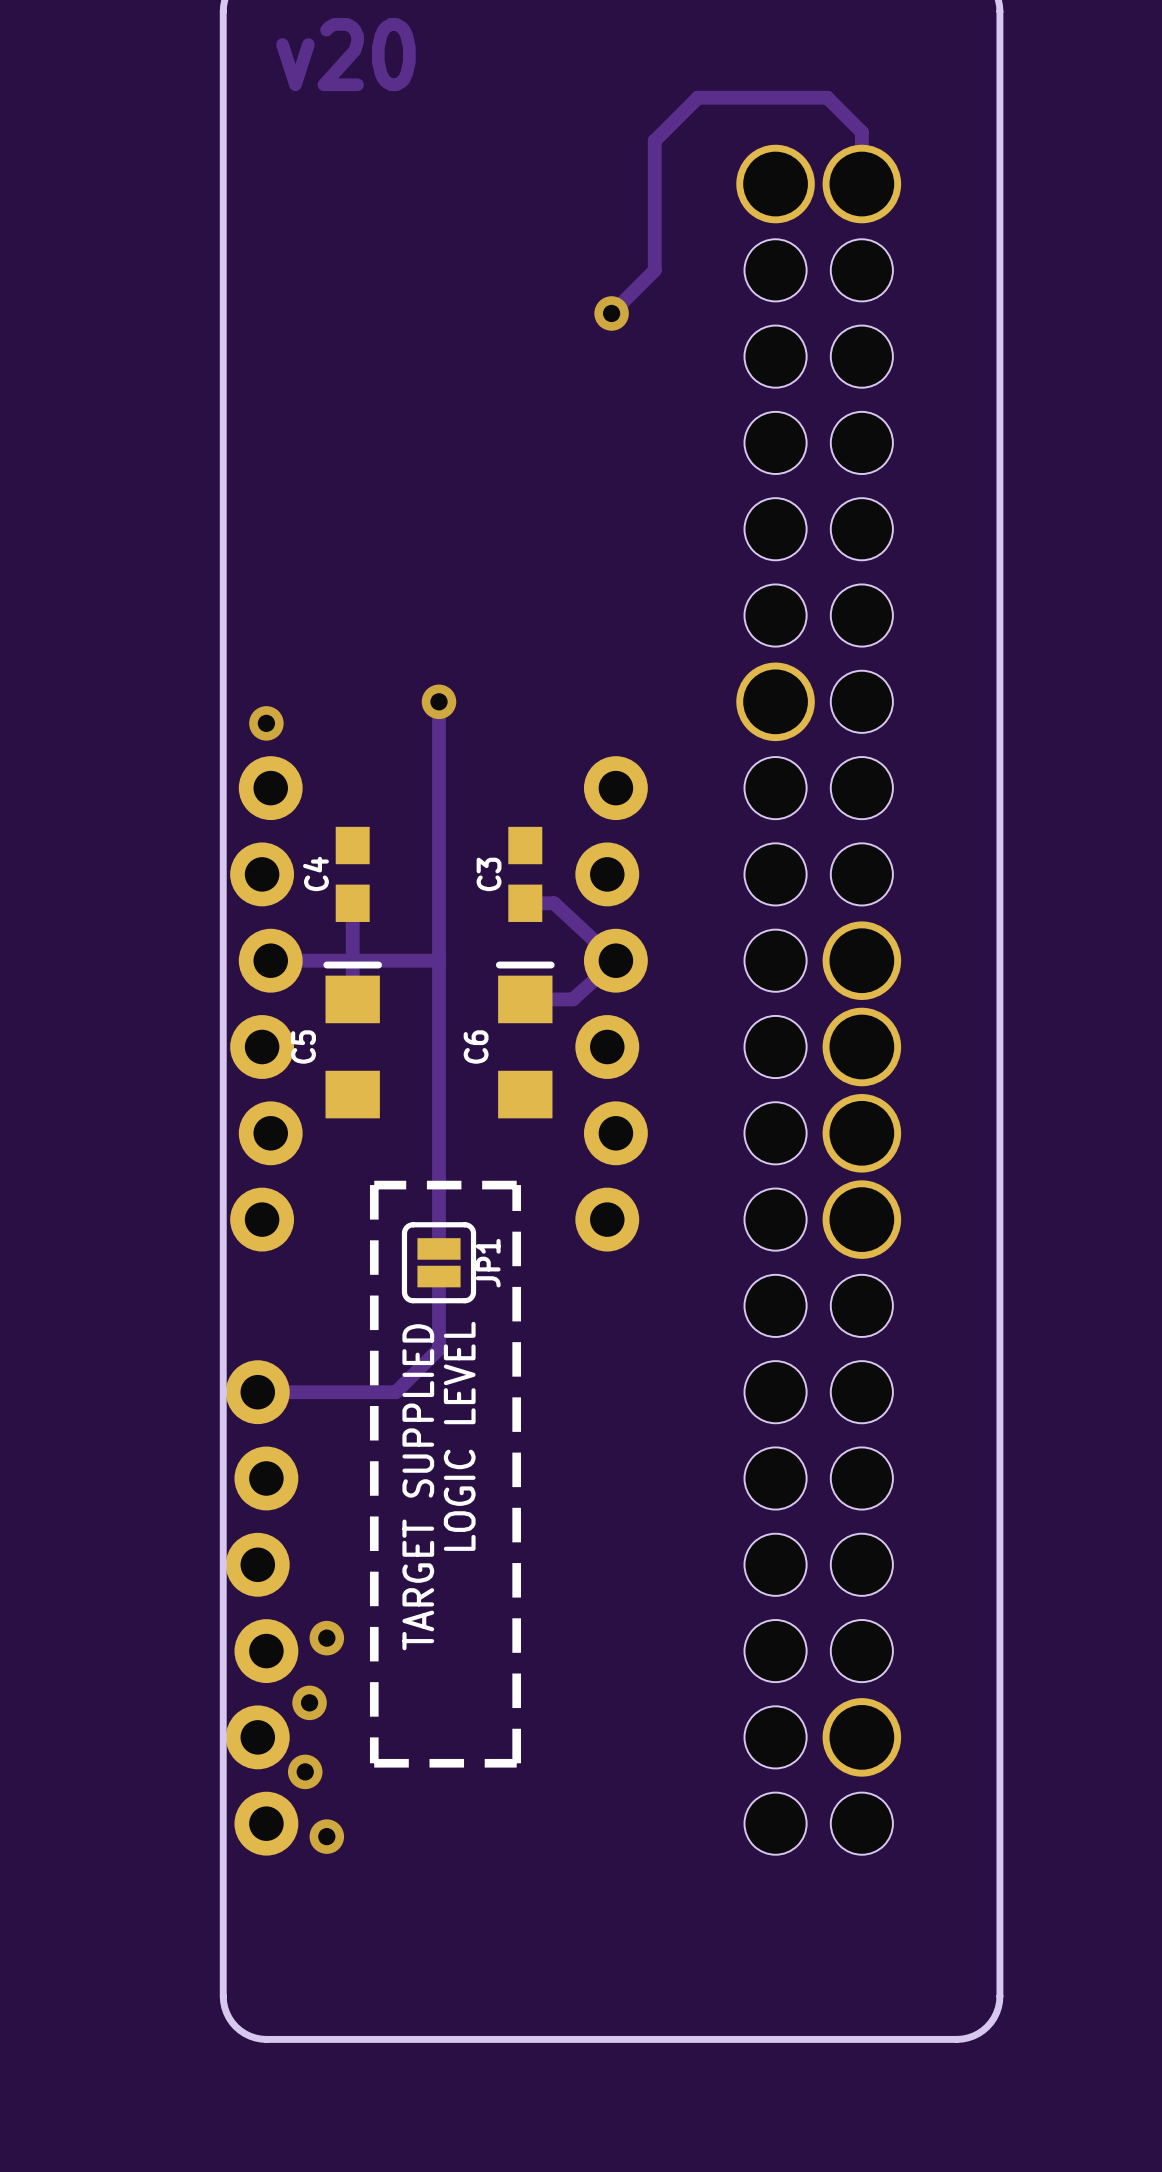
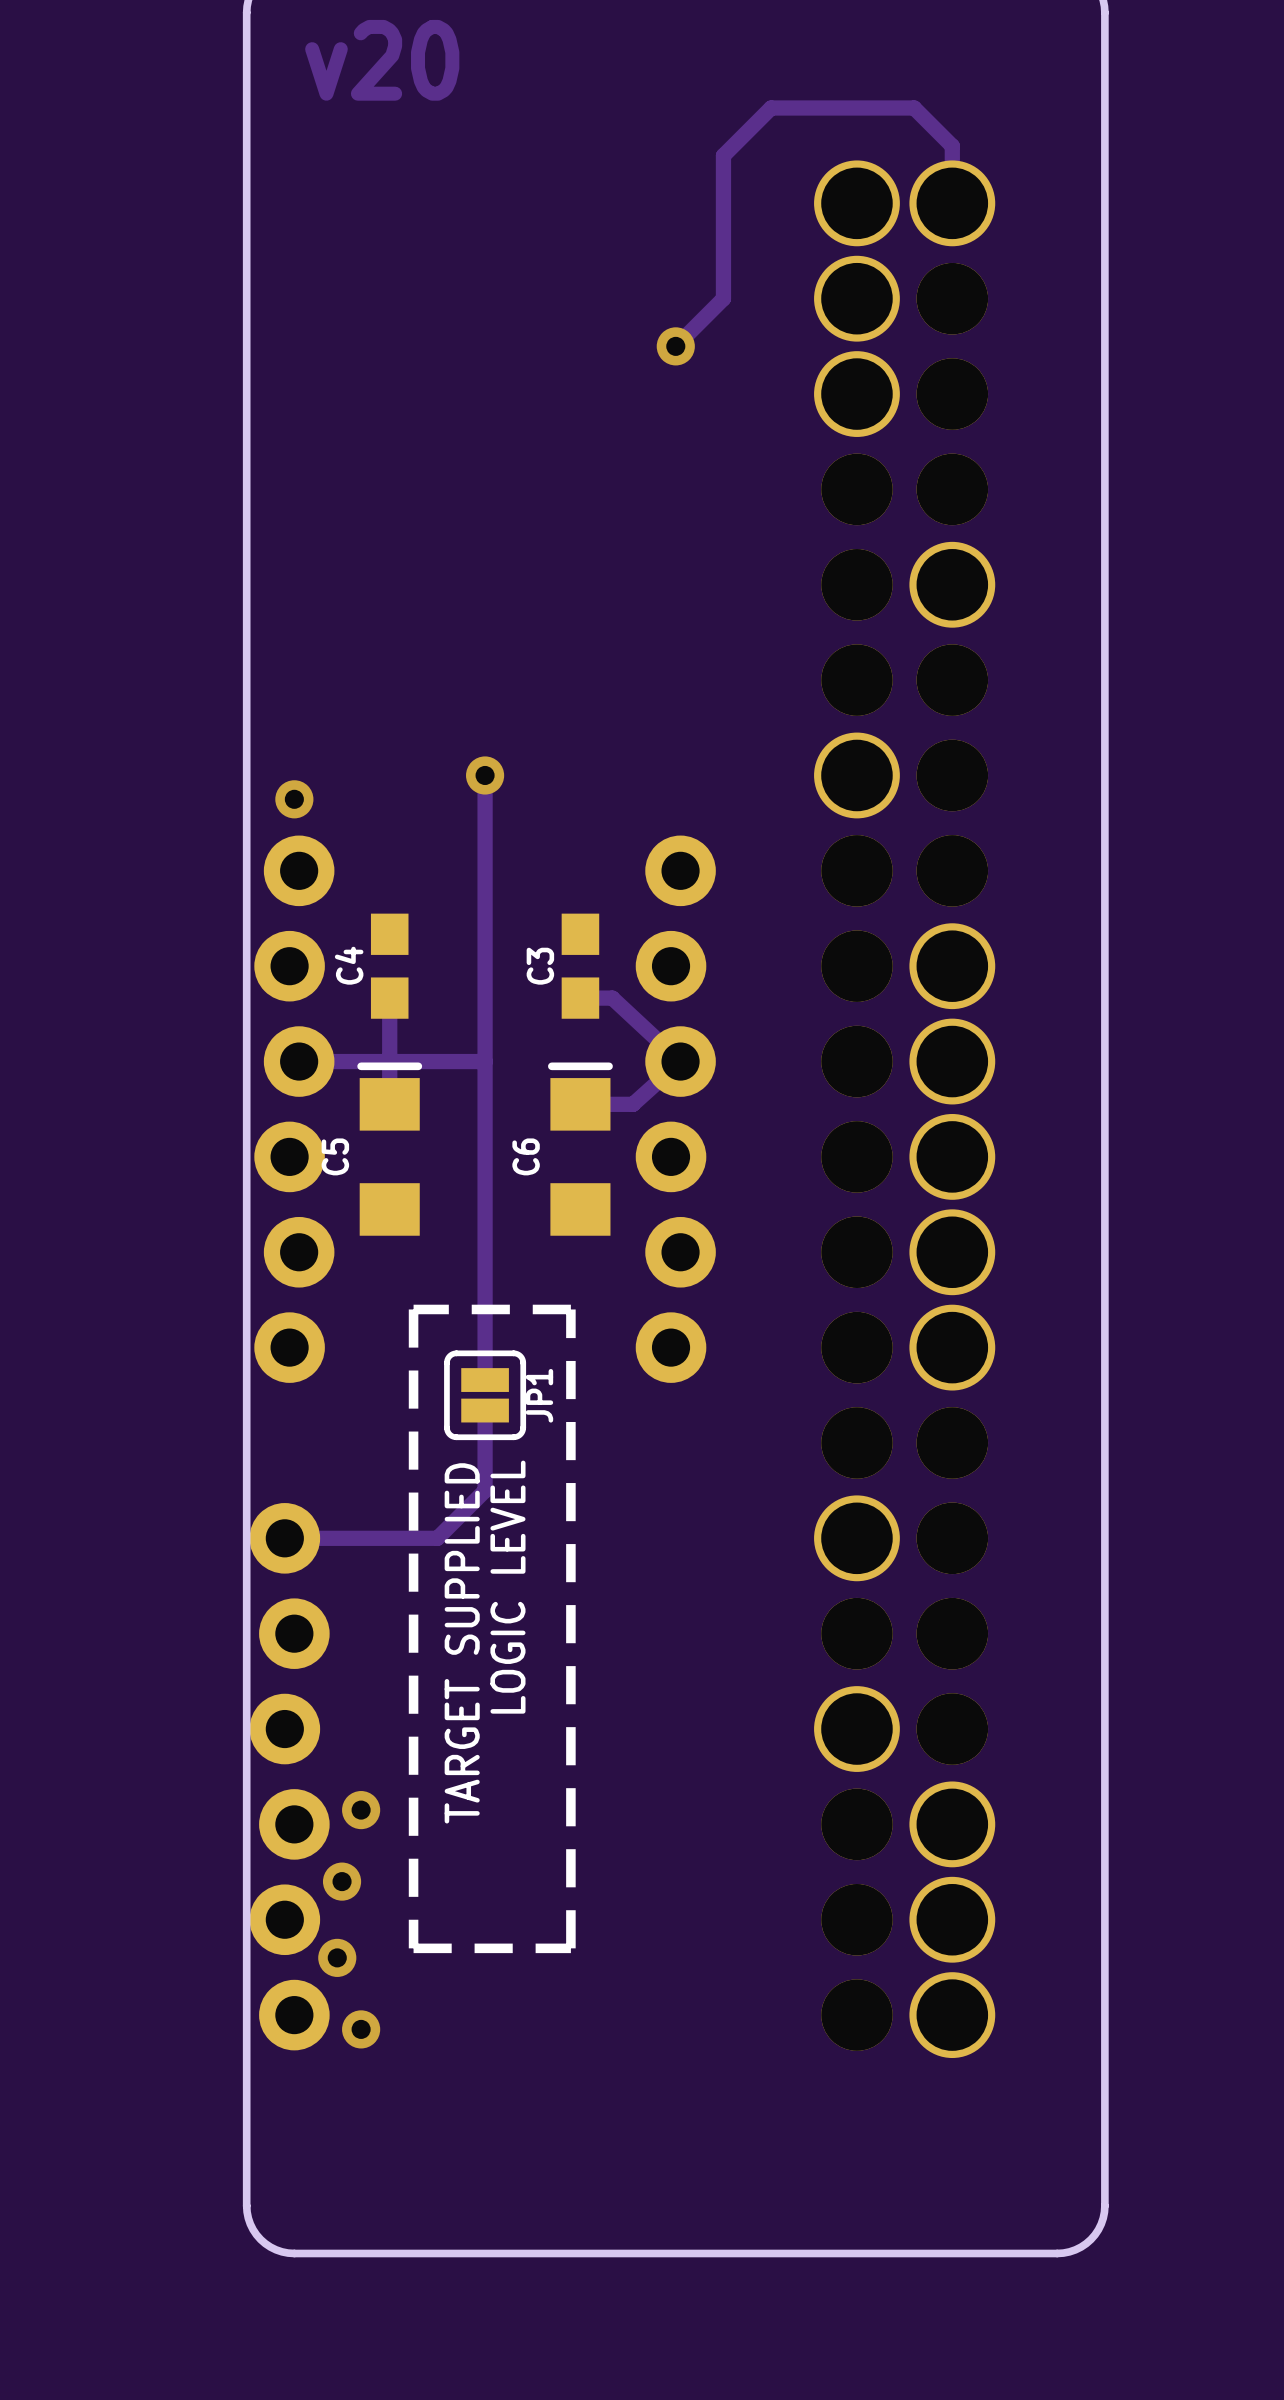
part footprint: [736, 144, 902, 1855] -> [814, 160, 996, 2059]

